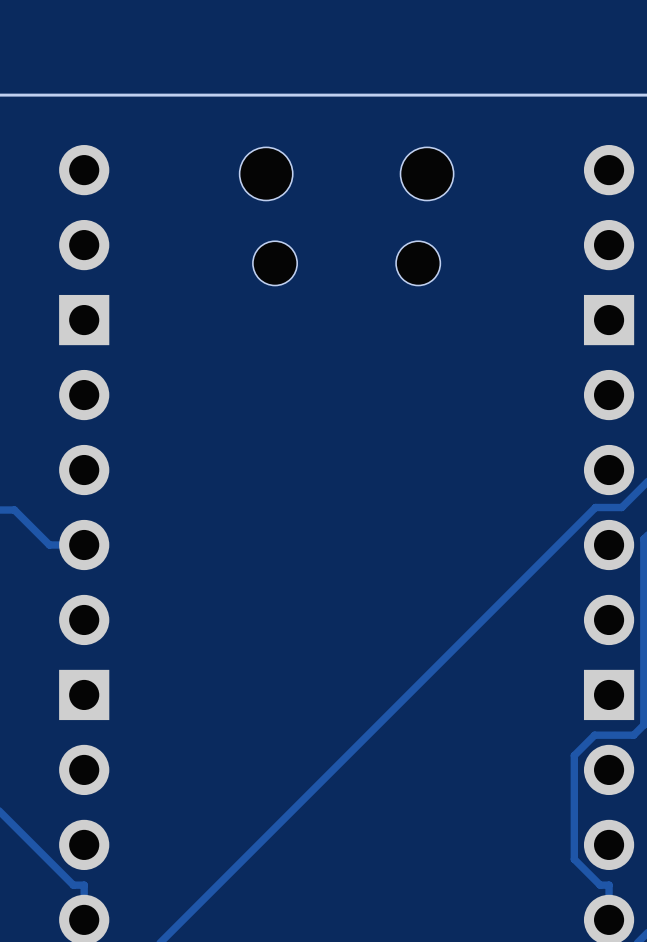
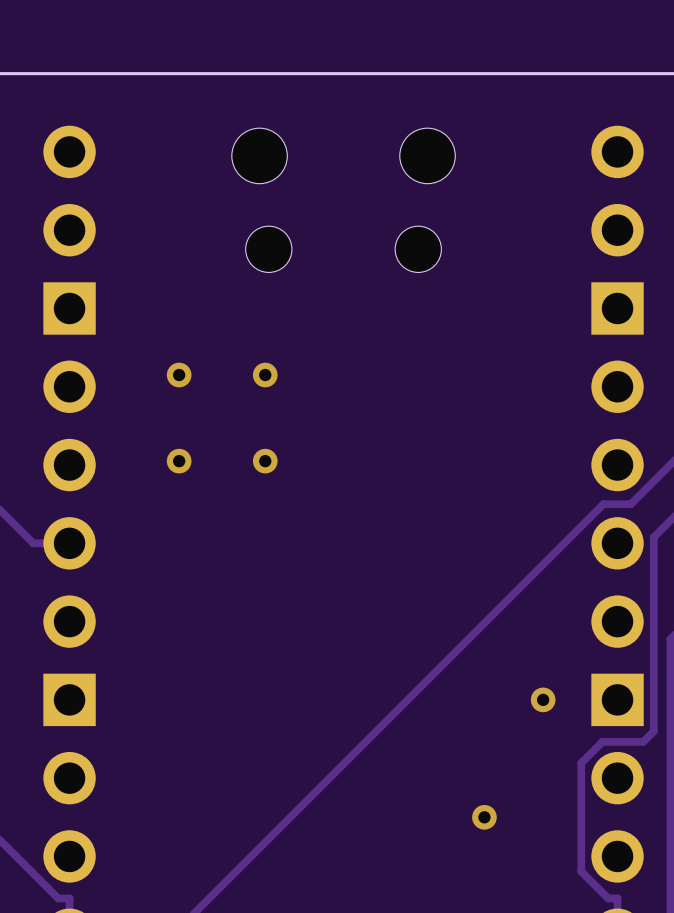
via: none -> (179, 375)
via: none -> (265, 375)
via: none -> (179, 461)
via: none -> (265, 461)
via: none -> (543, 699)
via: none -> (484, 817)

